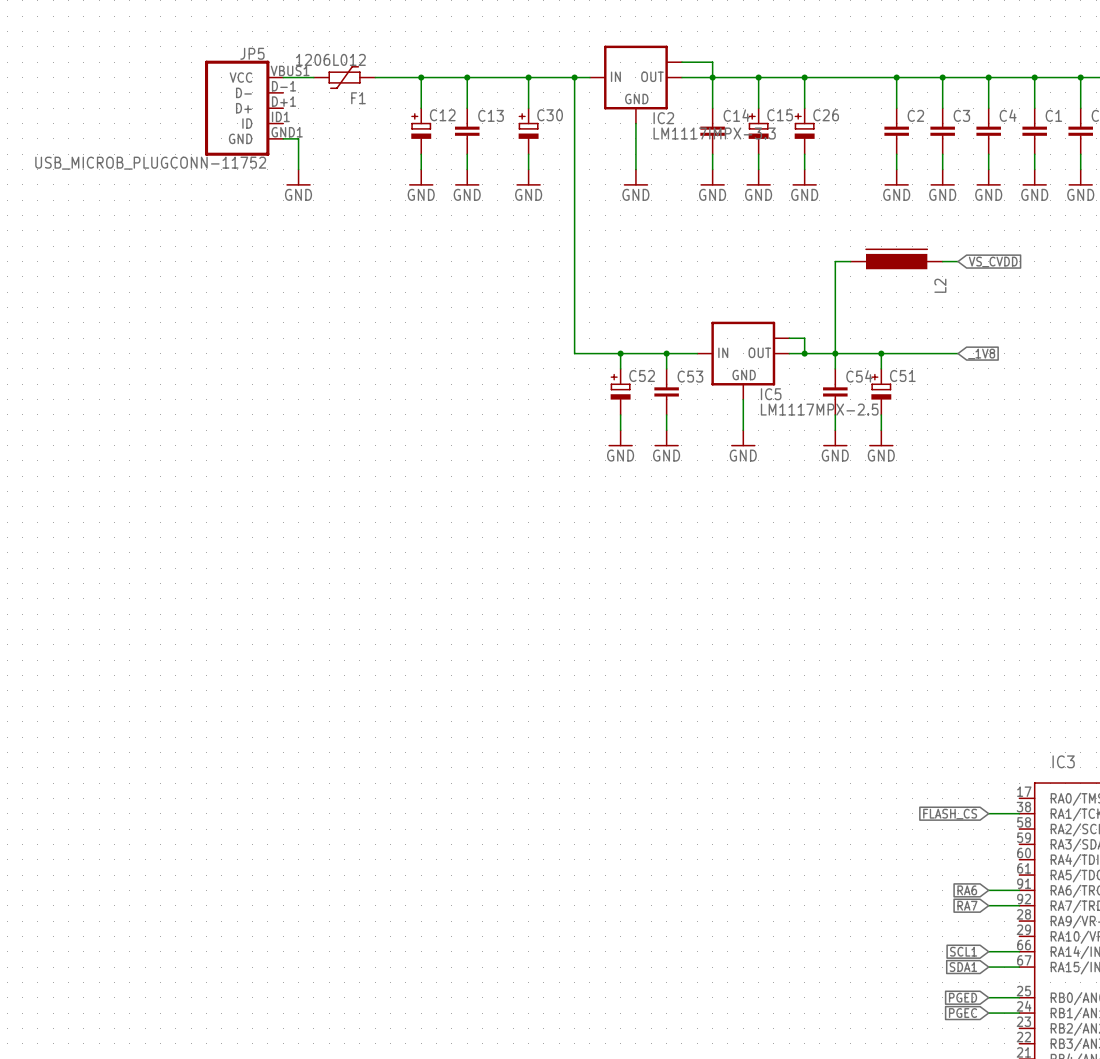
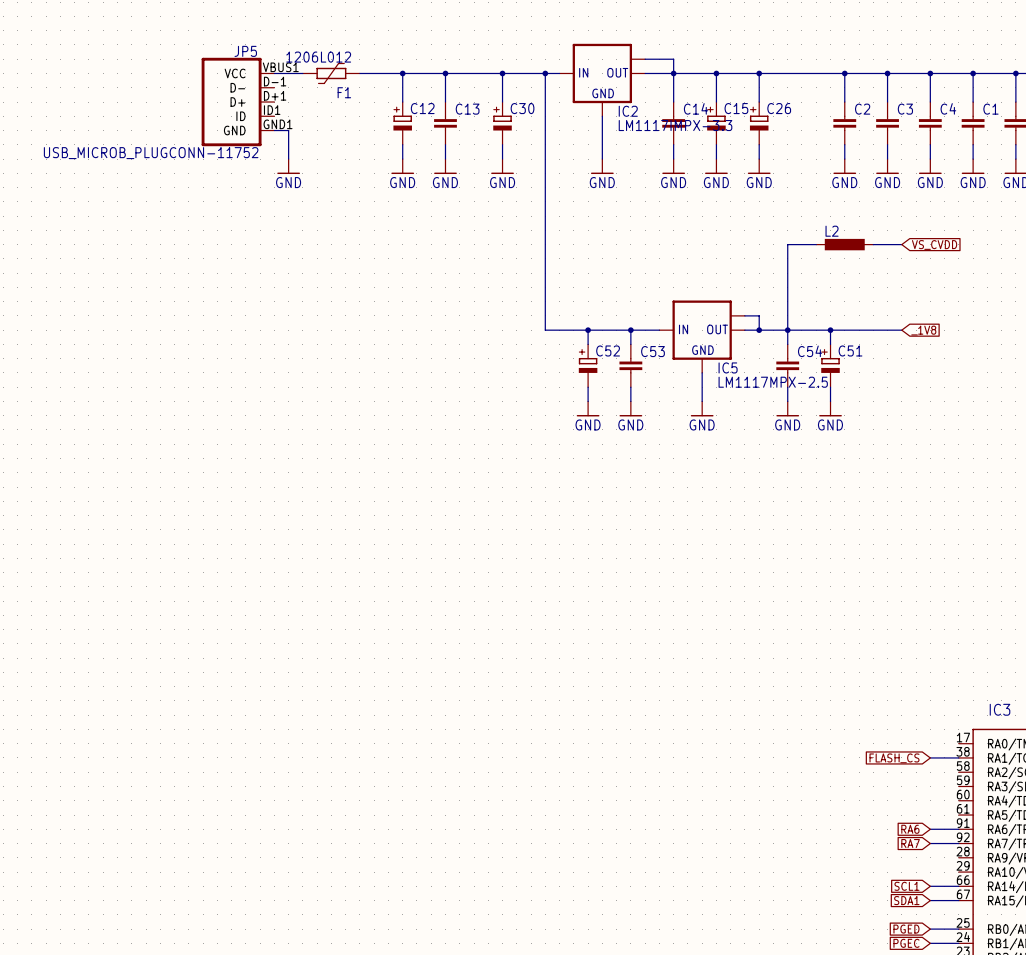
L2 symbol: [850, 248, 943, 270] -> [816, 238, 874, 251]
L2 name position: L2 (940, 285) -> L2 (832, 231)

